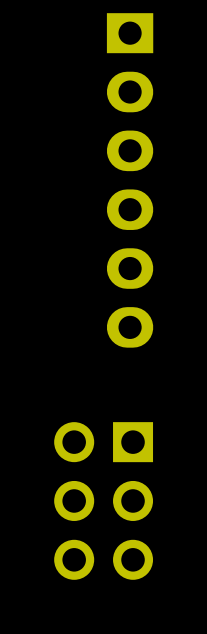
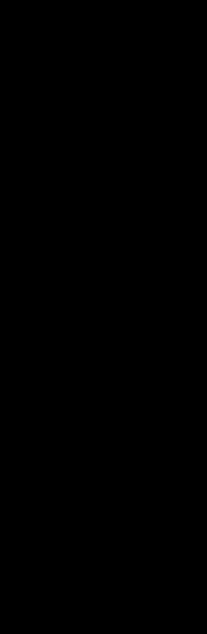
part: (130, 180) -> none
part: (103, 500) -> none

